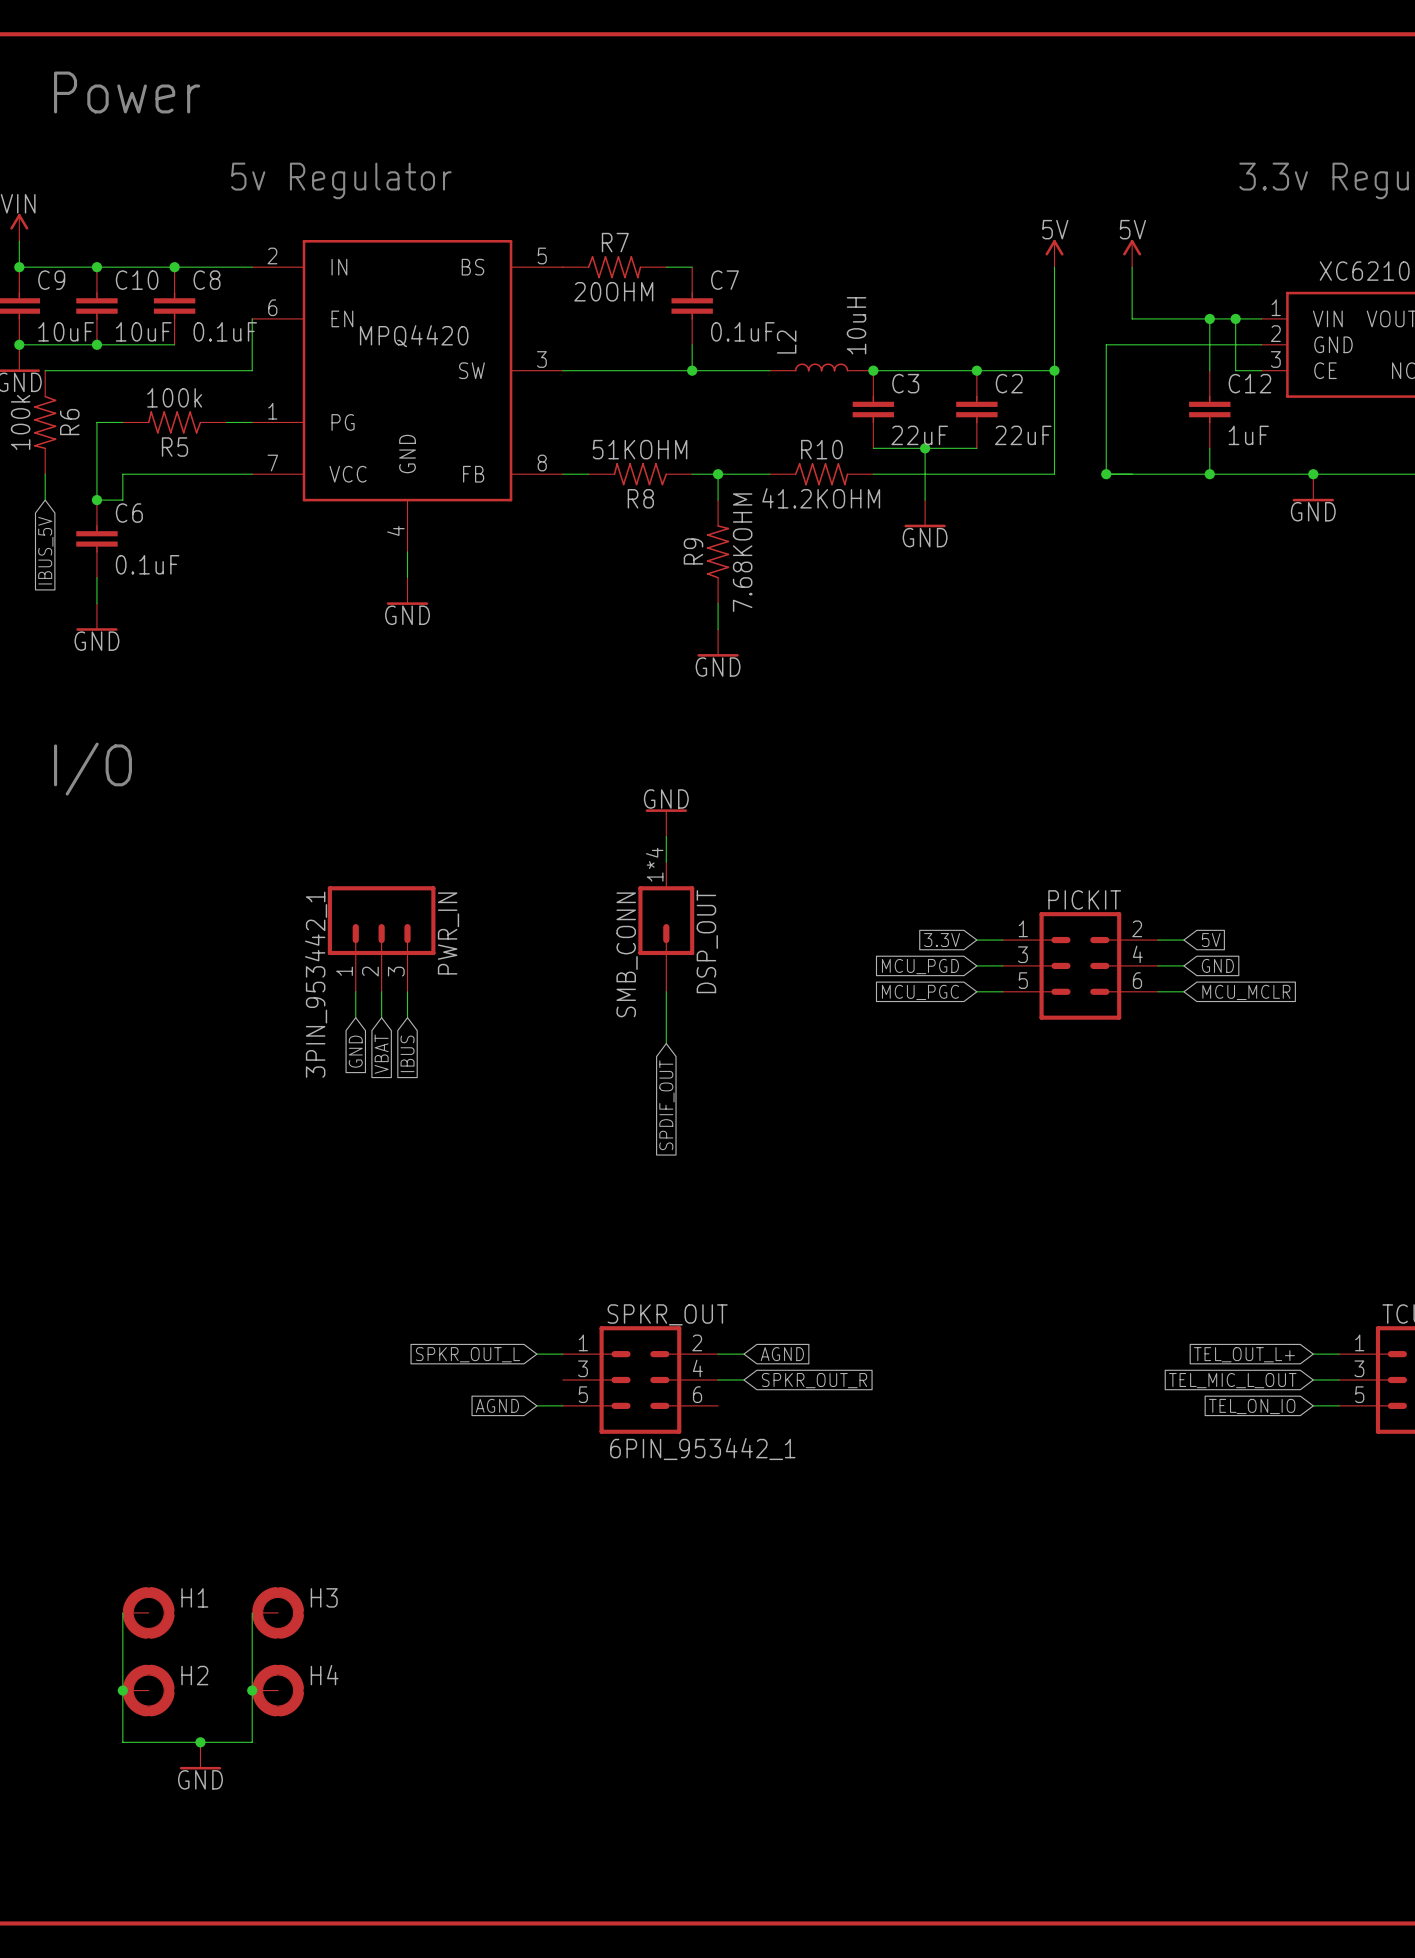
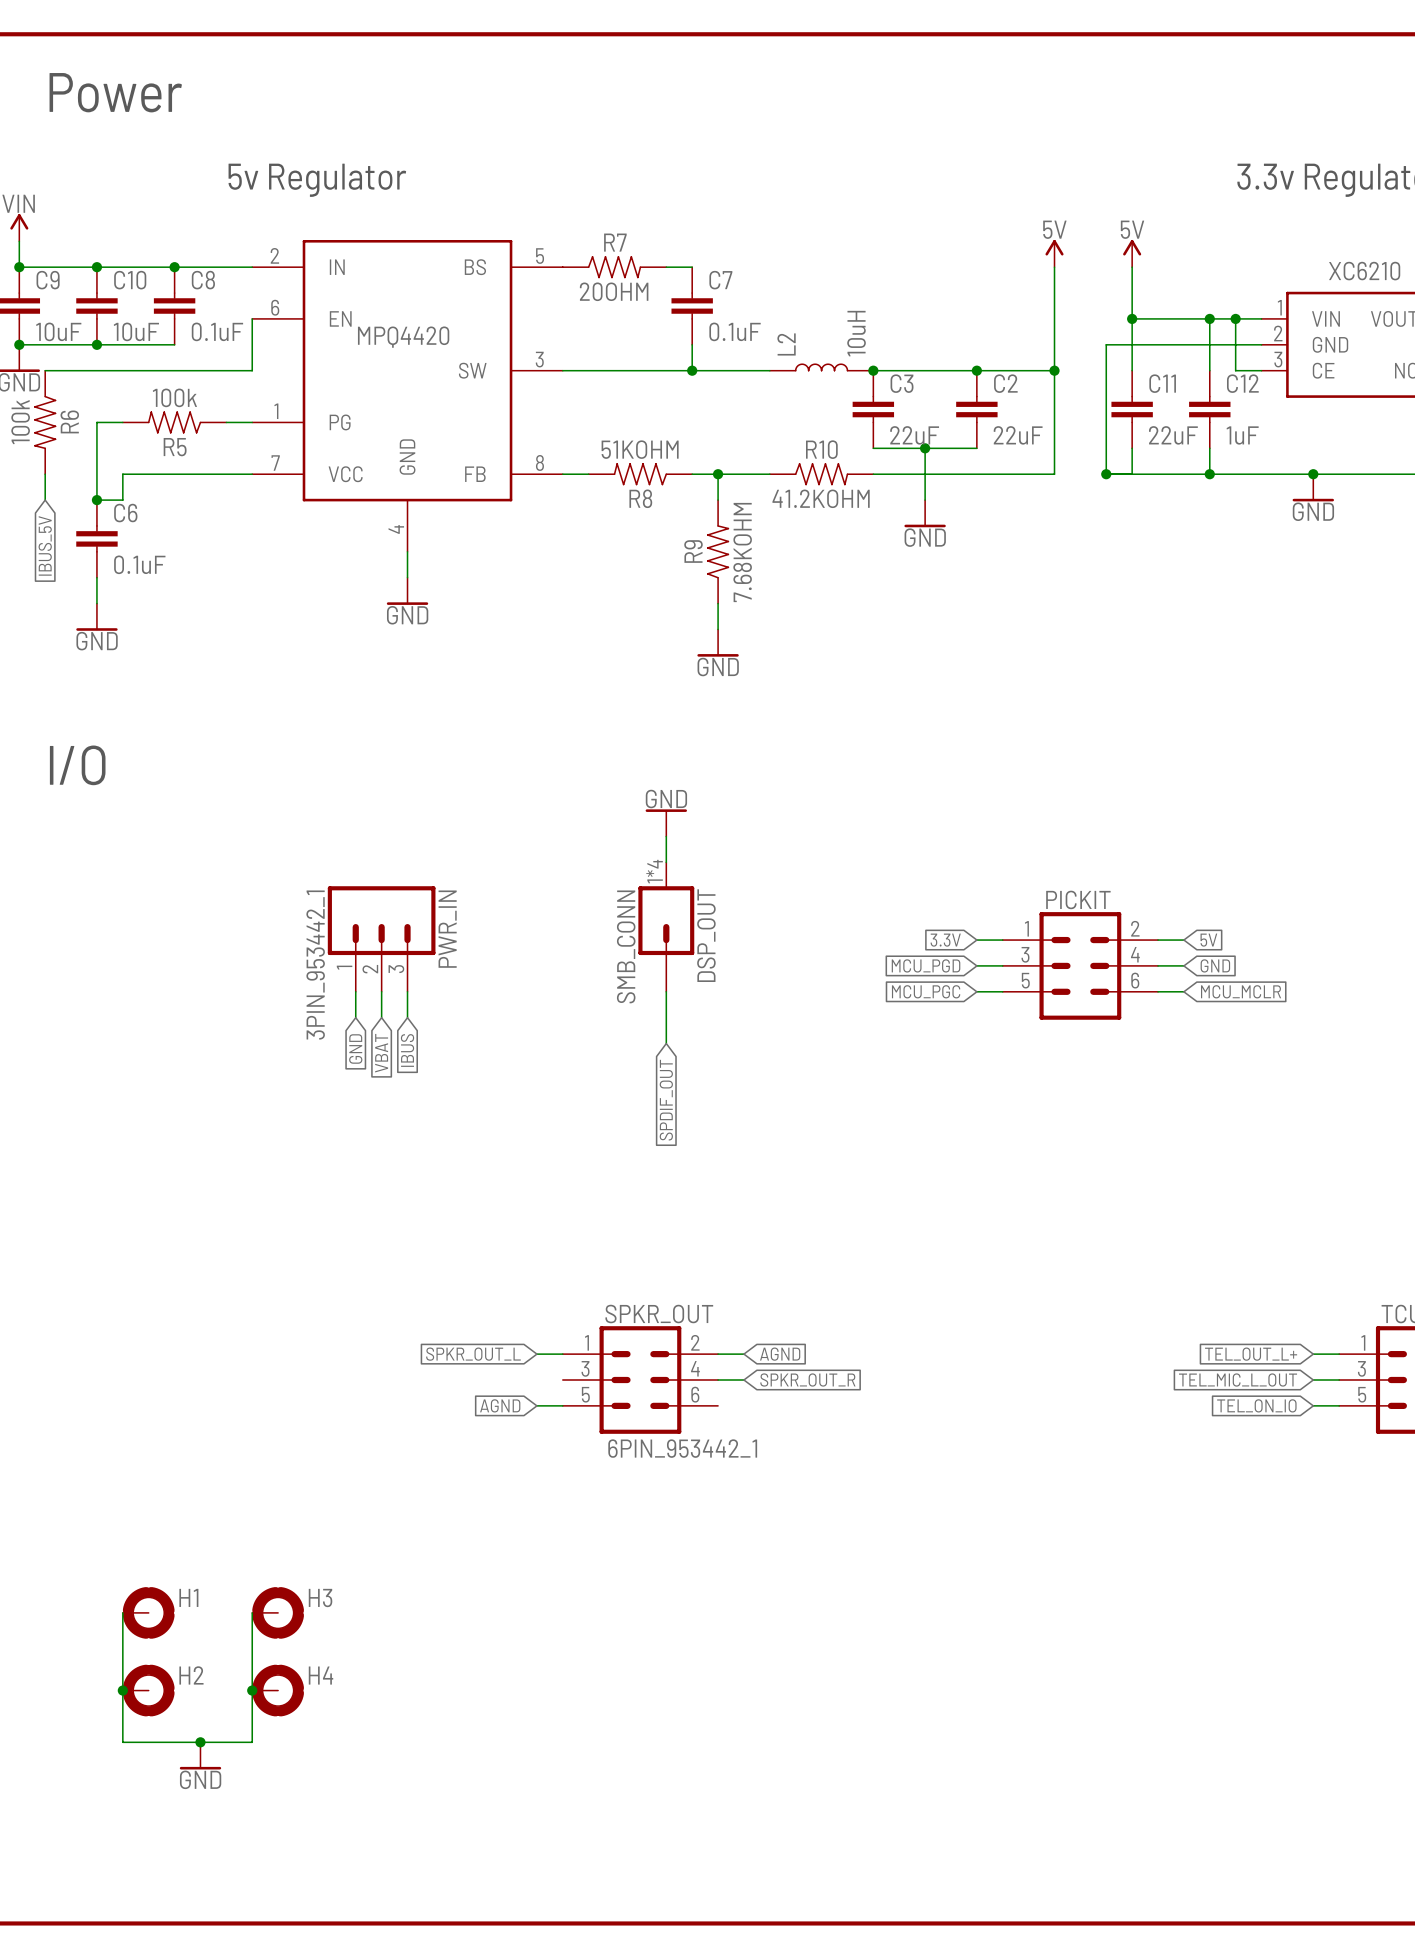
wire: none -> (1132, 318) (1132, 370)
junction: none -> (1132, 318)
C11: none -> 22uF (1132, 409)
wire: none -> (1132, 448) (1132, 474)

